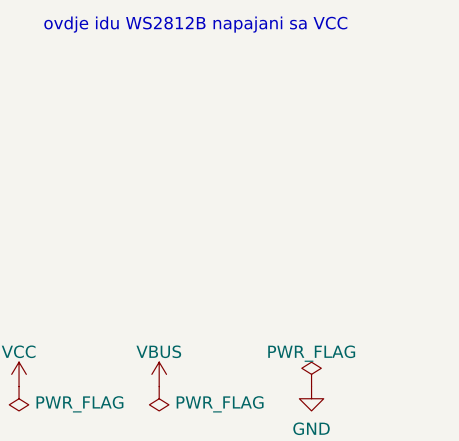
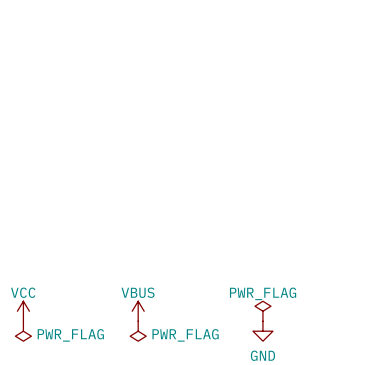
text: ovdje idu WS2812B napajani sa VCC (195, 24) -> none

